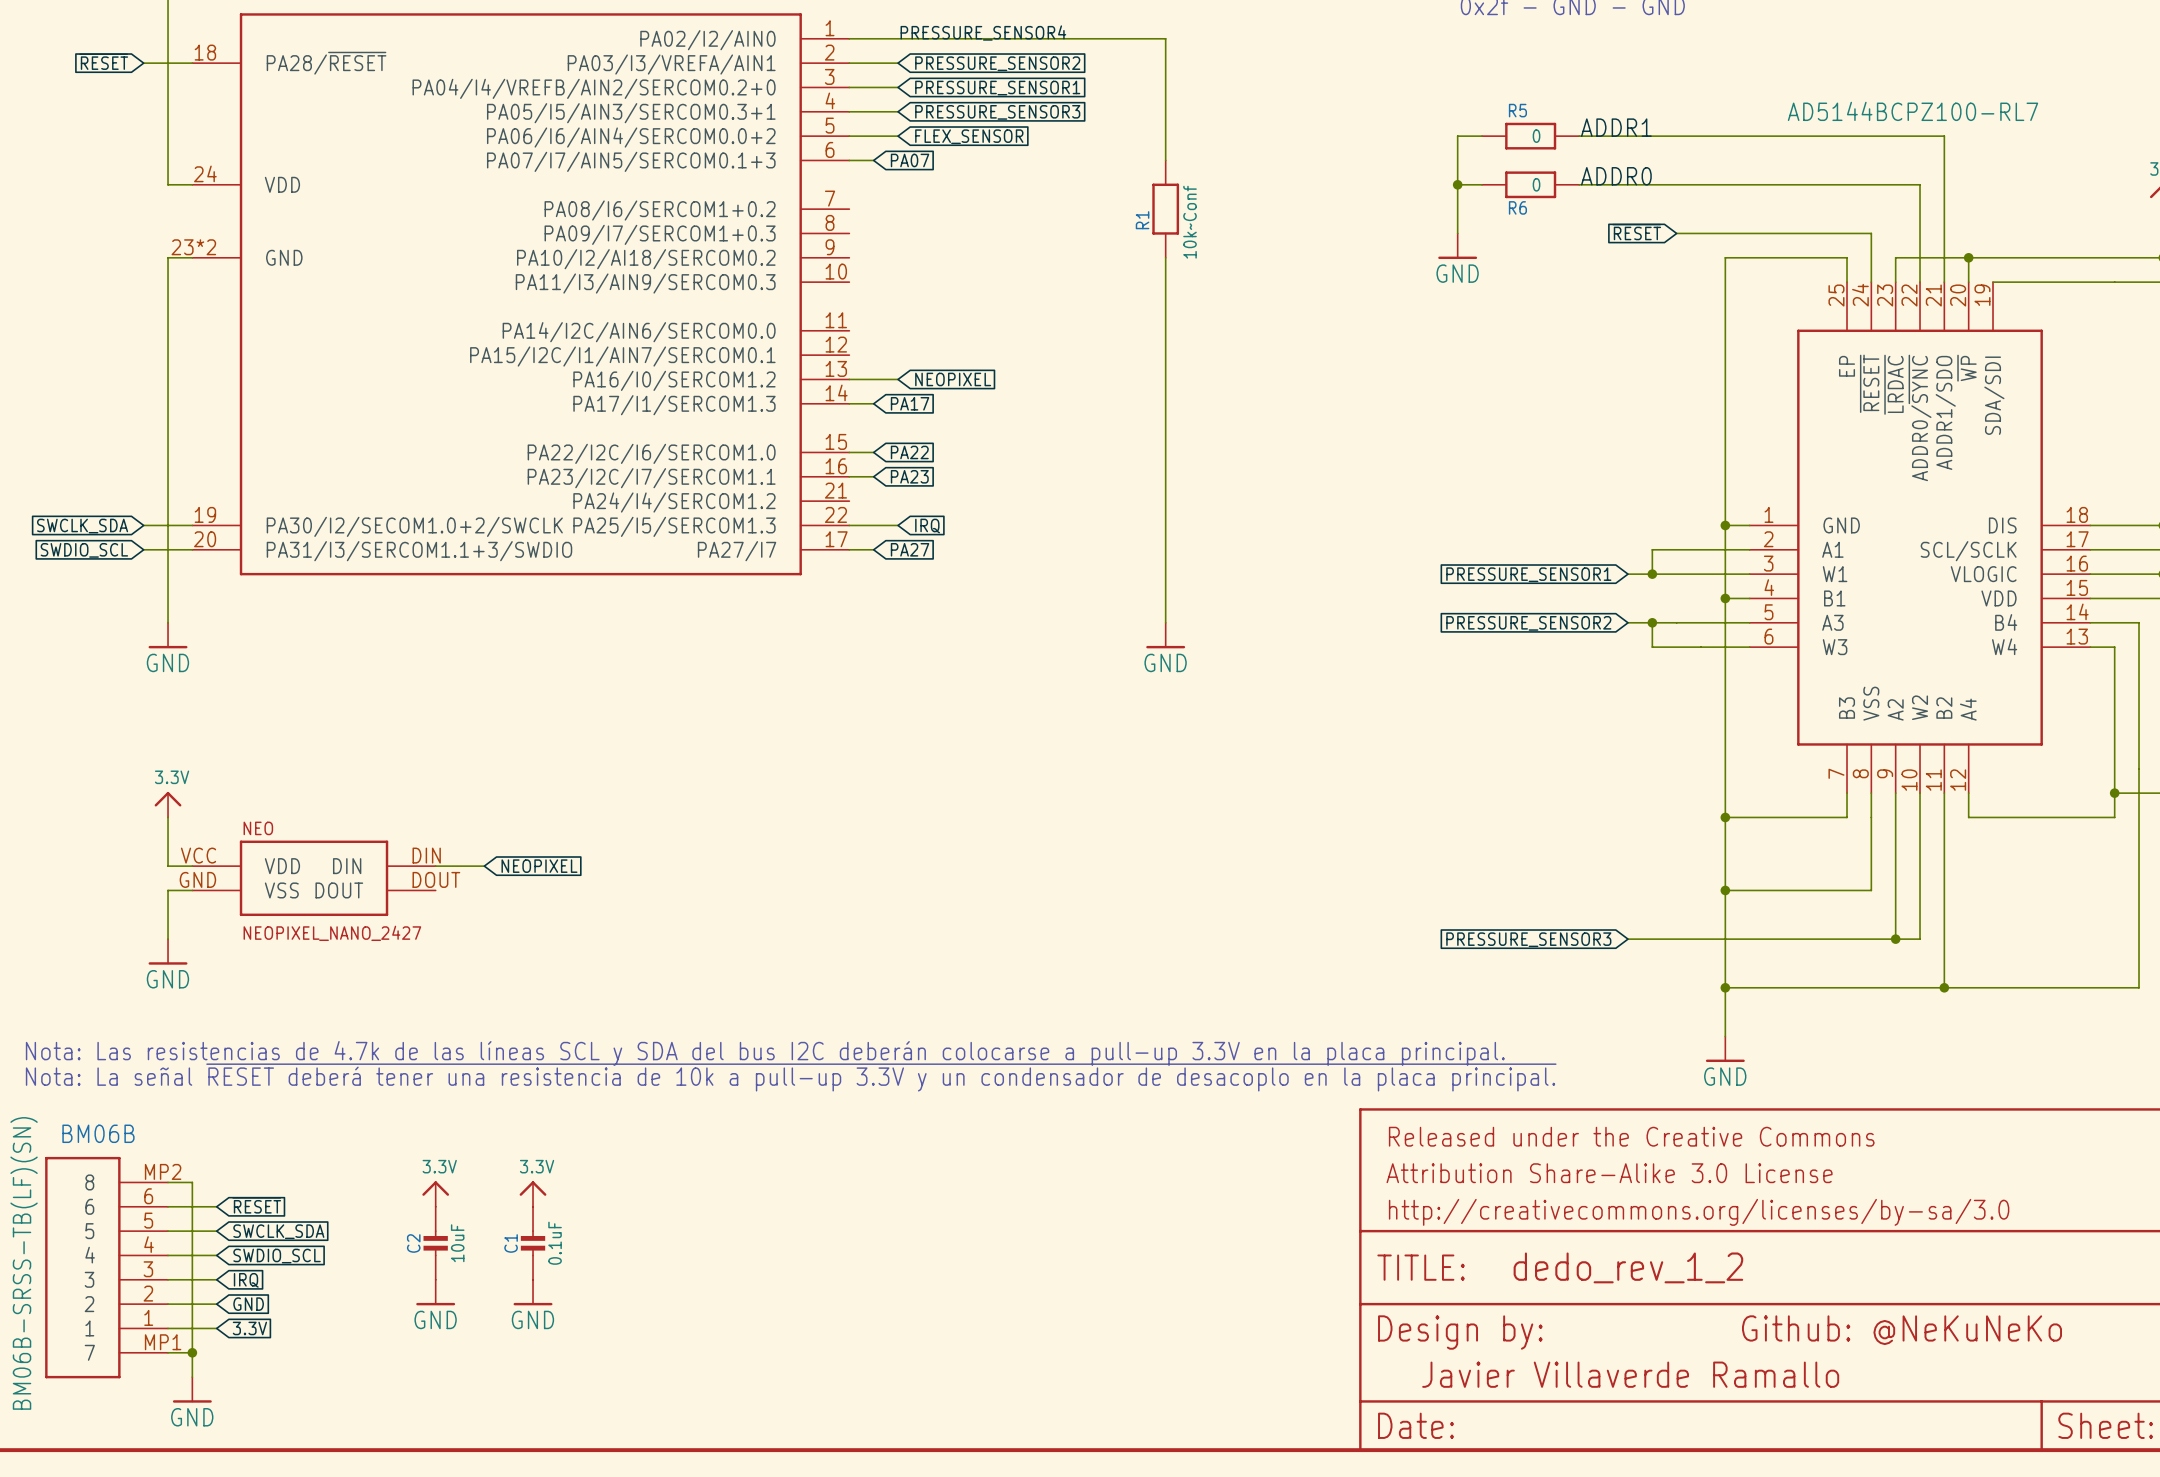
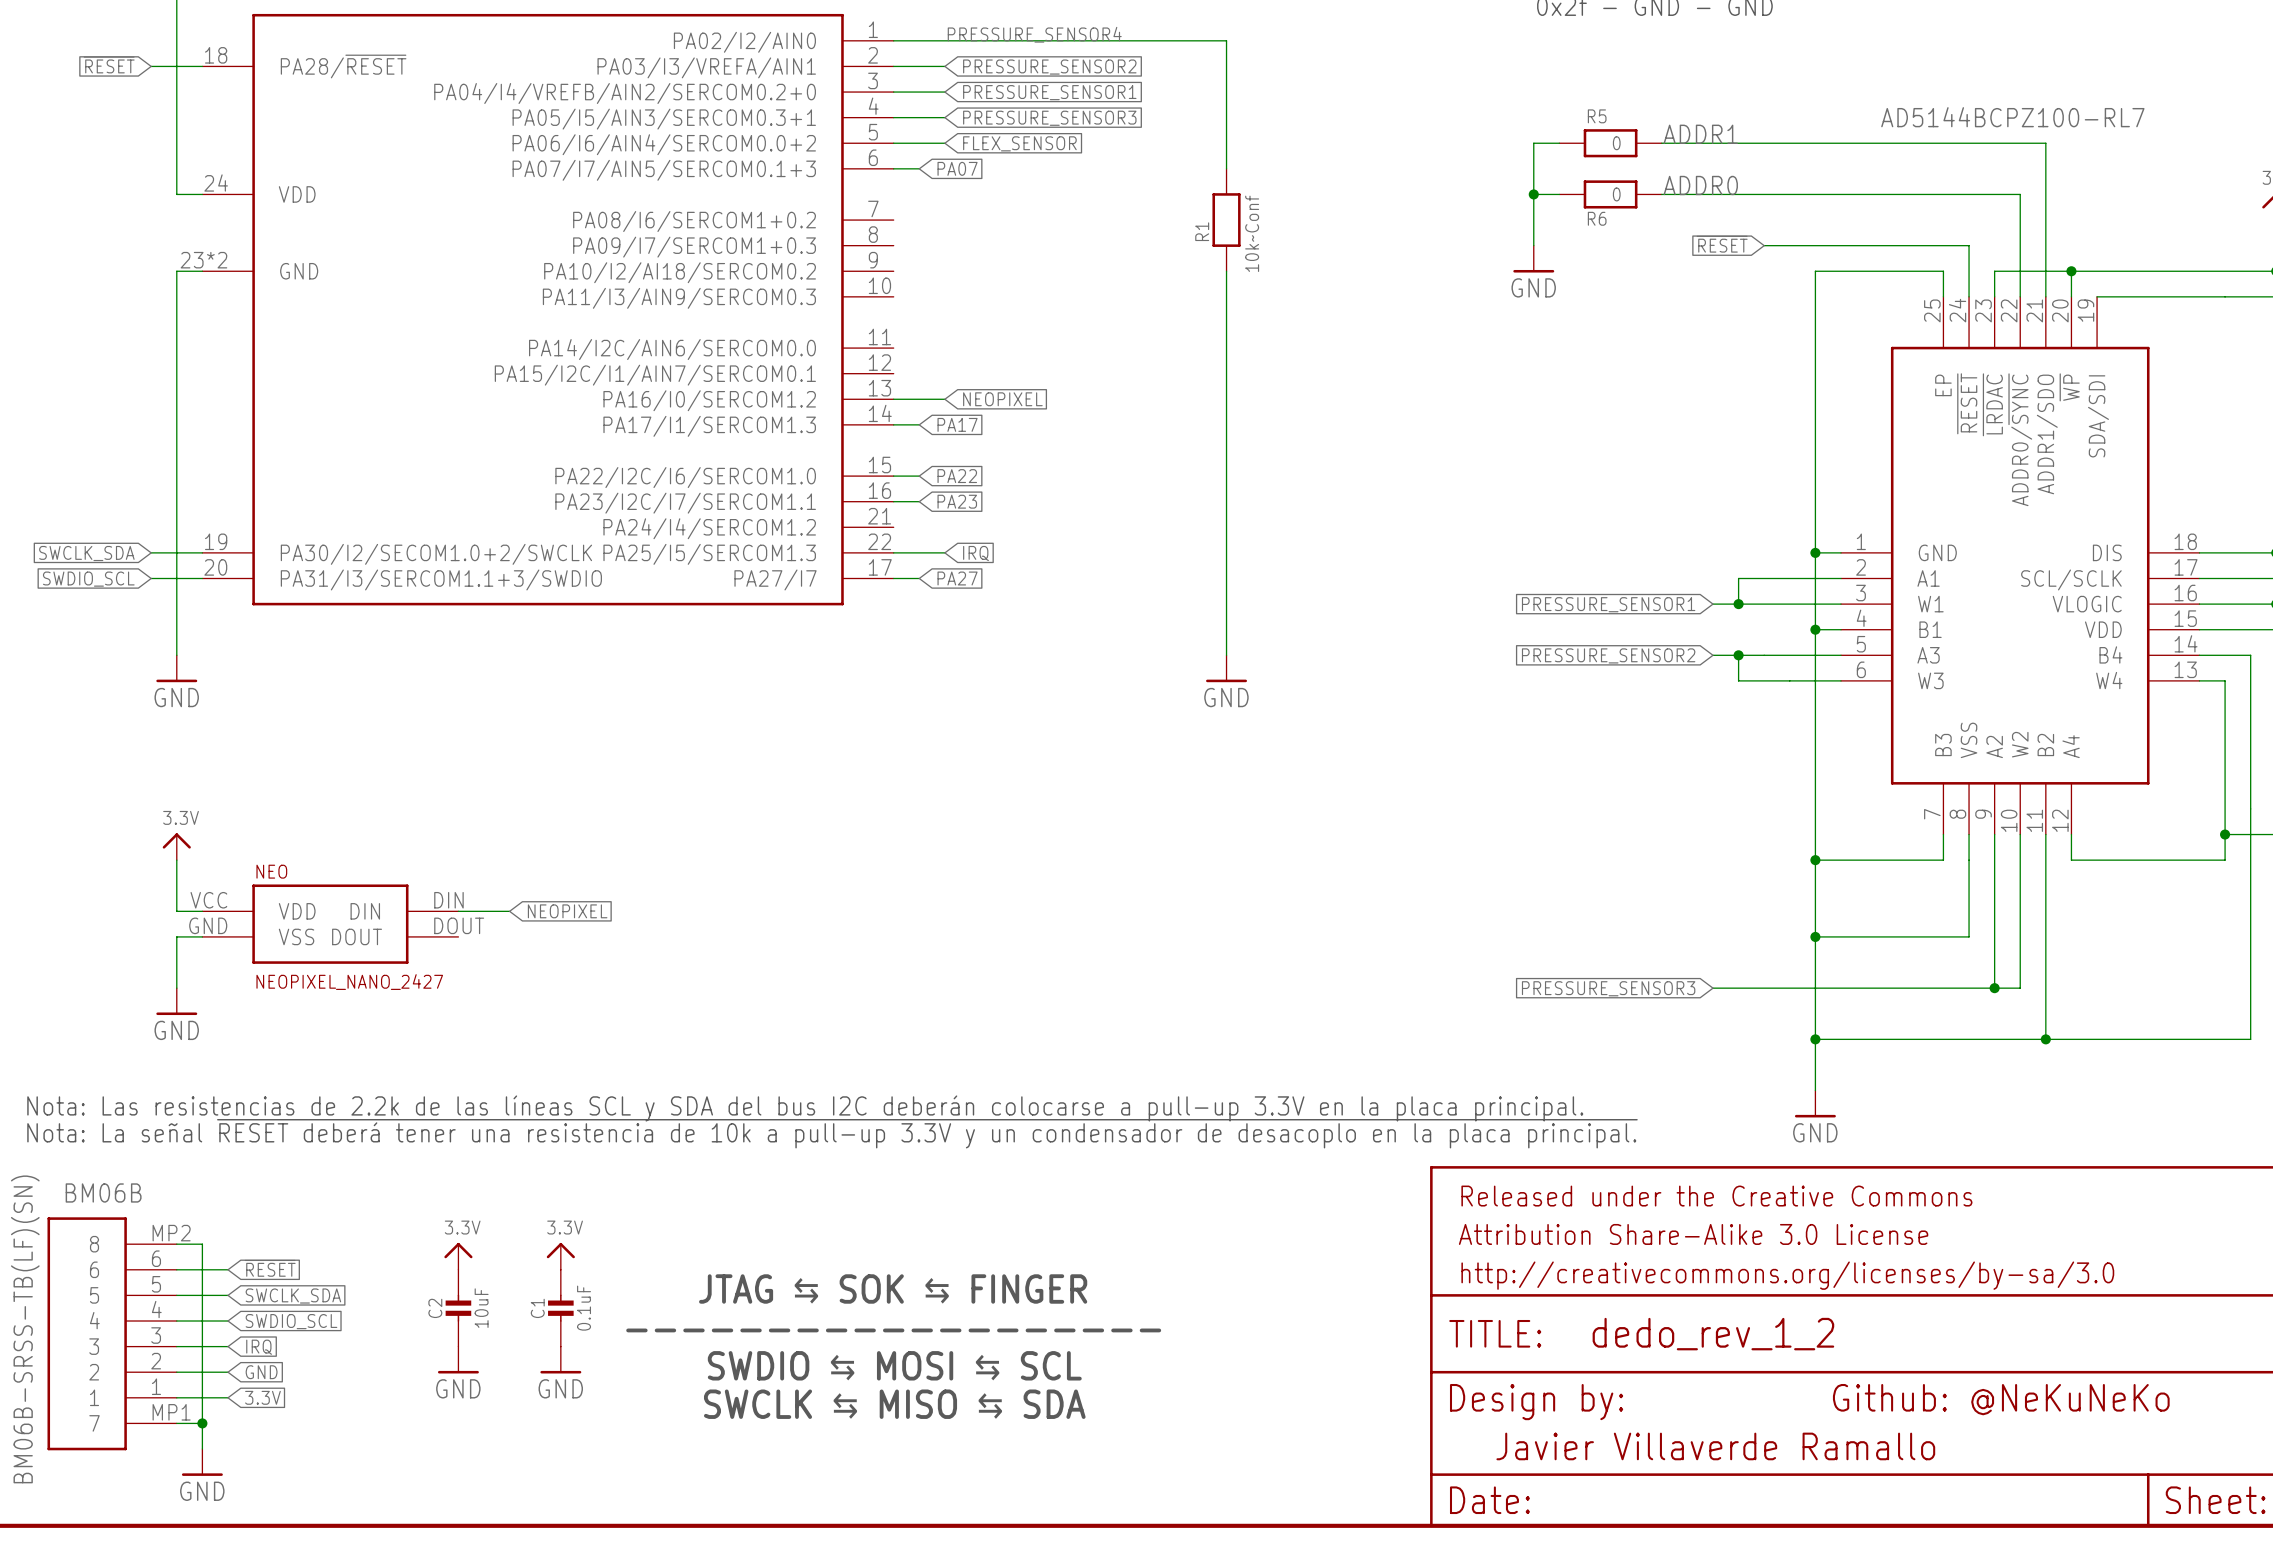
text: Nota: Las resistencias de 4.7k de las líneas SCL y SDA del bus I2C deberán colocarse a pull-up 3.3V en la placa principal. (765, 1053) -> Nota: Las resistencias de 2.2k de las líneas SCL y SDA del bus I2C deberán colocarse a pull-up 3.3V en la placa principal. (805, 1108)
text: none -> JTAG ⇆ SOK ⇆ FINGER (893, 1289)
text: none -> ------------------- (893, 1330)
text: none -> SWDIO ⇆ MOSI ⇆ SCL (894, 1366)
text: none -> SWCLK ⇆ MISO ⇆ SDA (894, 1405)

